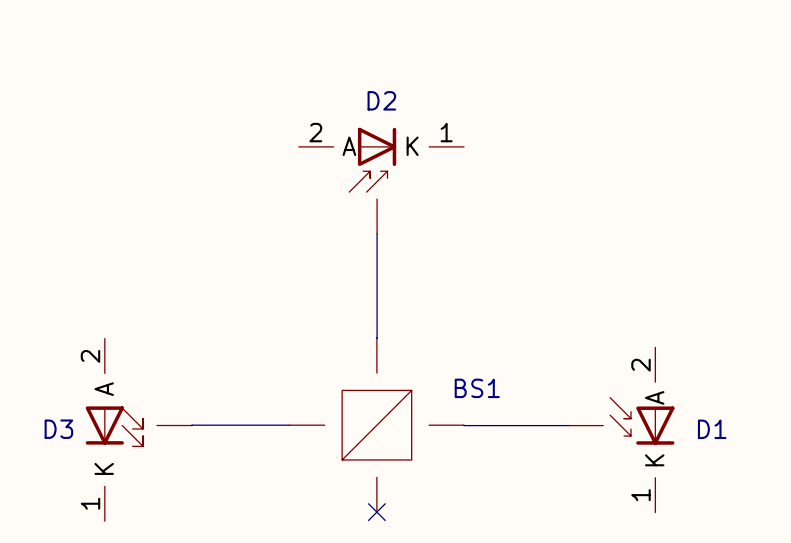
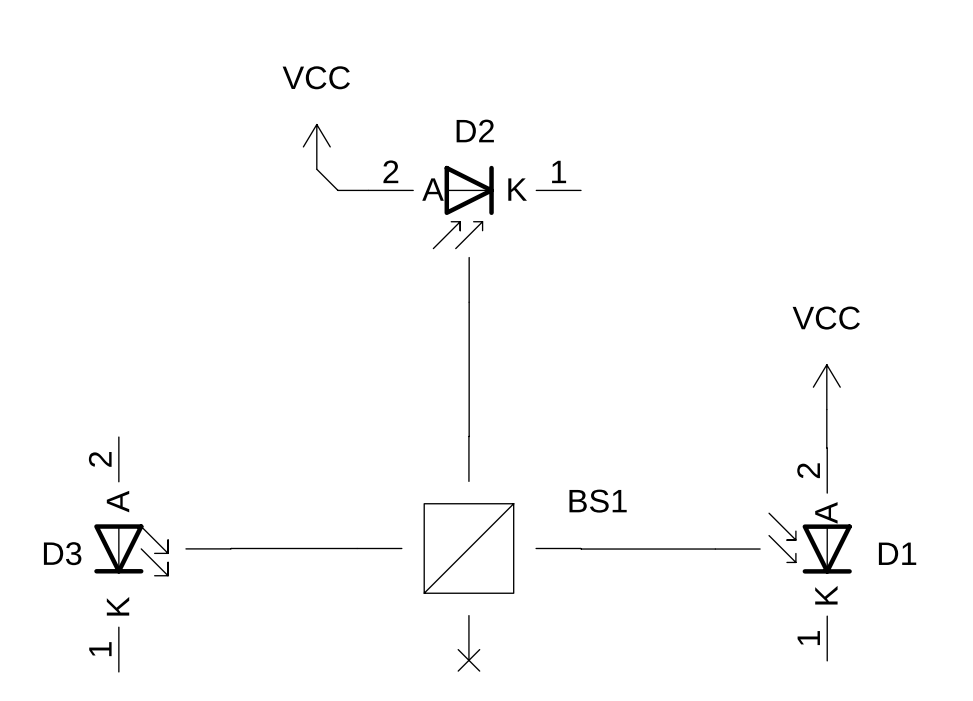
power symbol: none -> VCC (316, 146)
wire: none -> (316, 169) (337, 190) (368, 190)
power symbol: none -> VCC (826, 387)
wire: none -> (826, 409) (827, 448)

